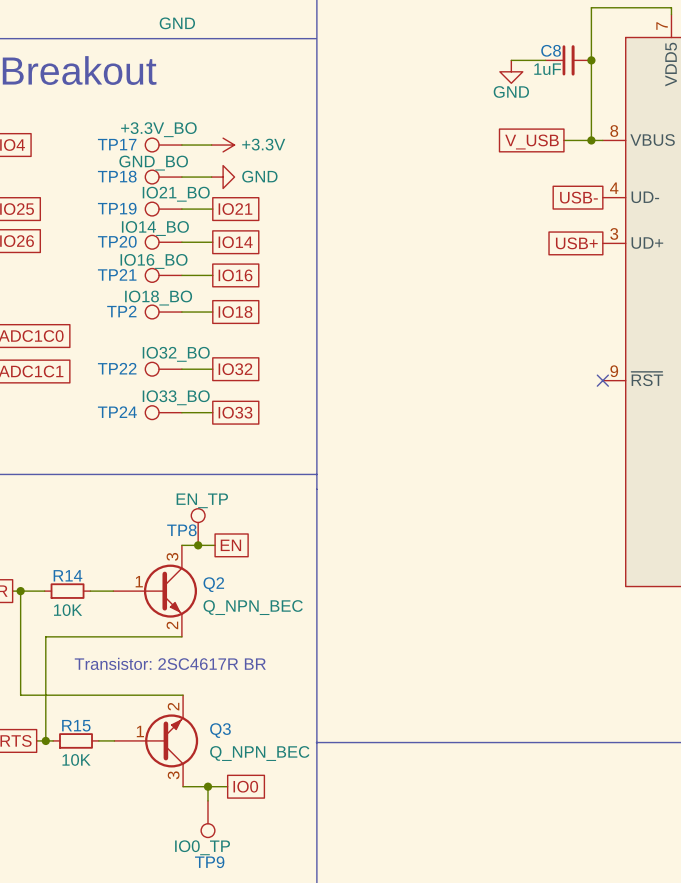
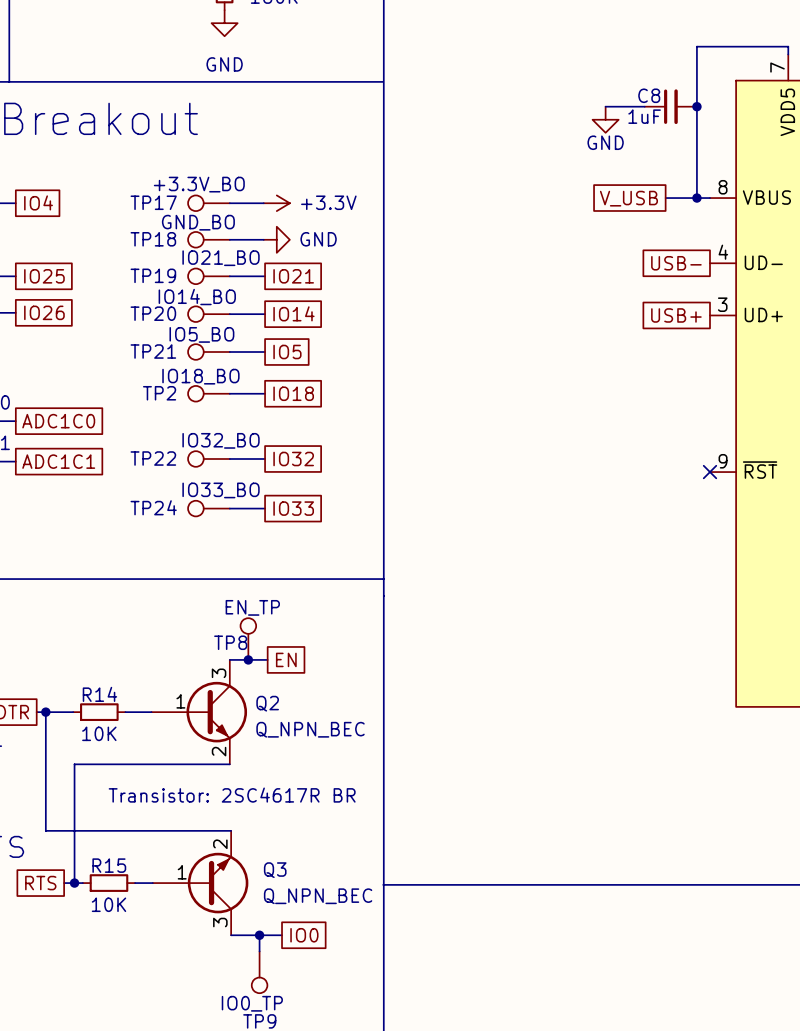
TP21 value: IO16_BO (154, 261) -> IO5_BO (201, 334)
global label: IO16 (235, 275) -> IO5 (287, 352)

